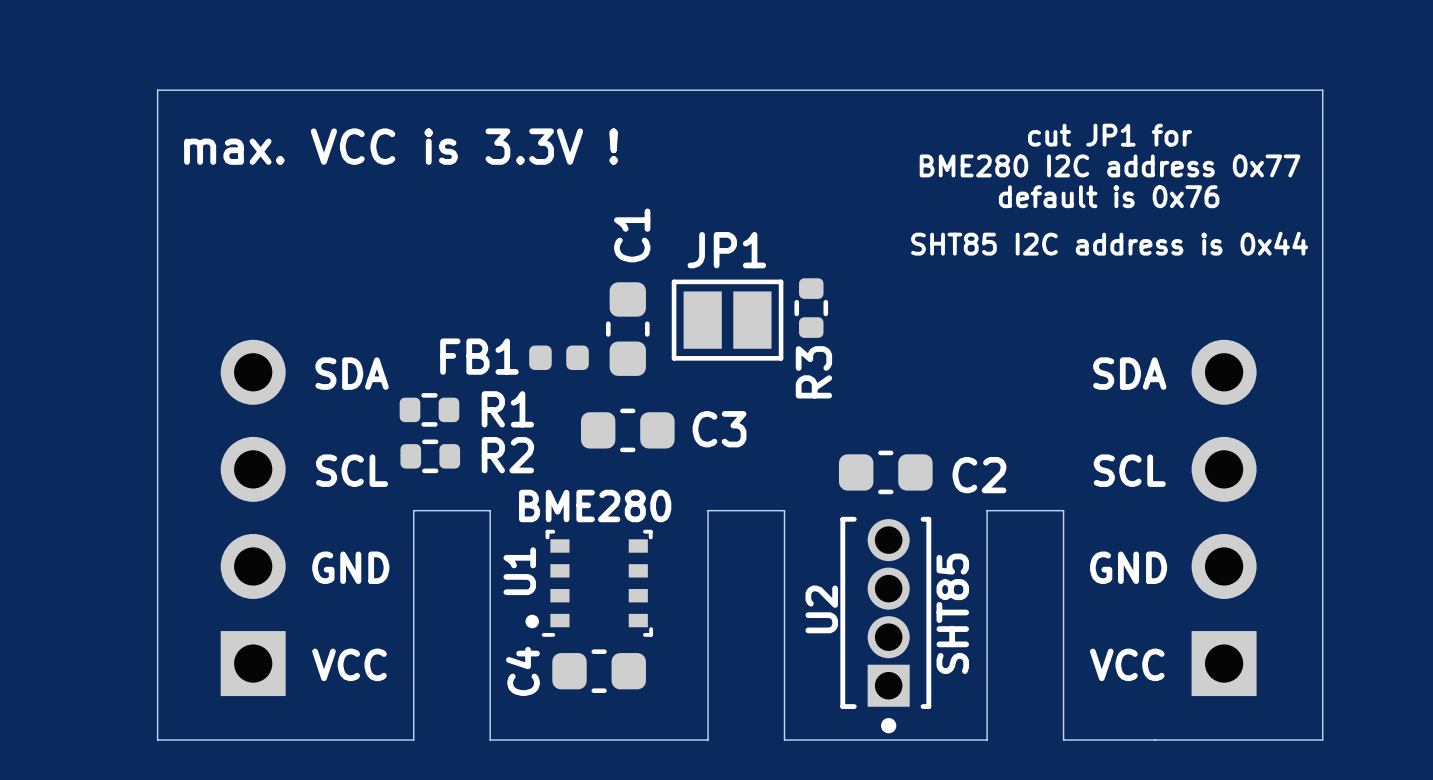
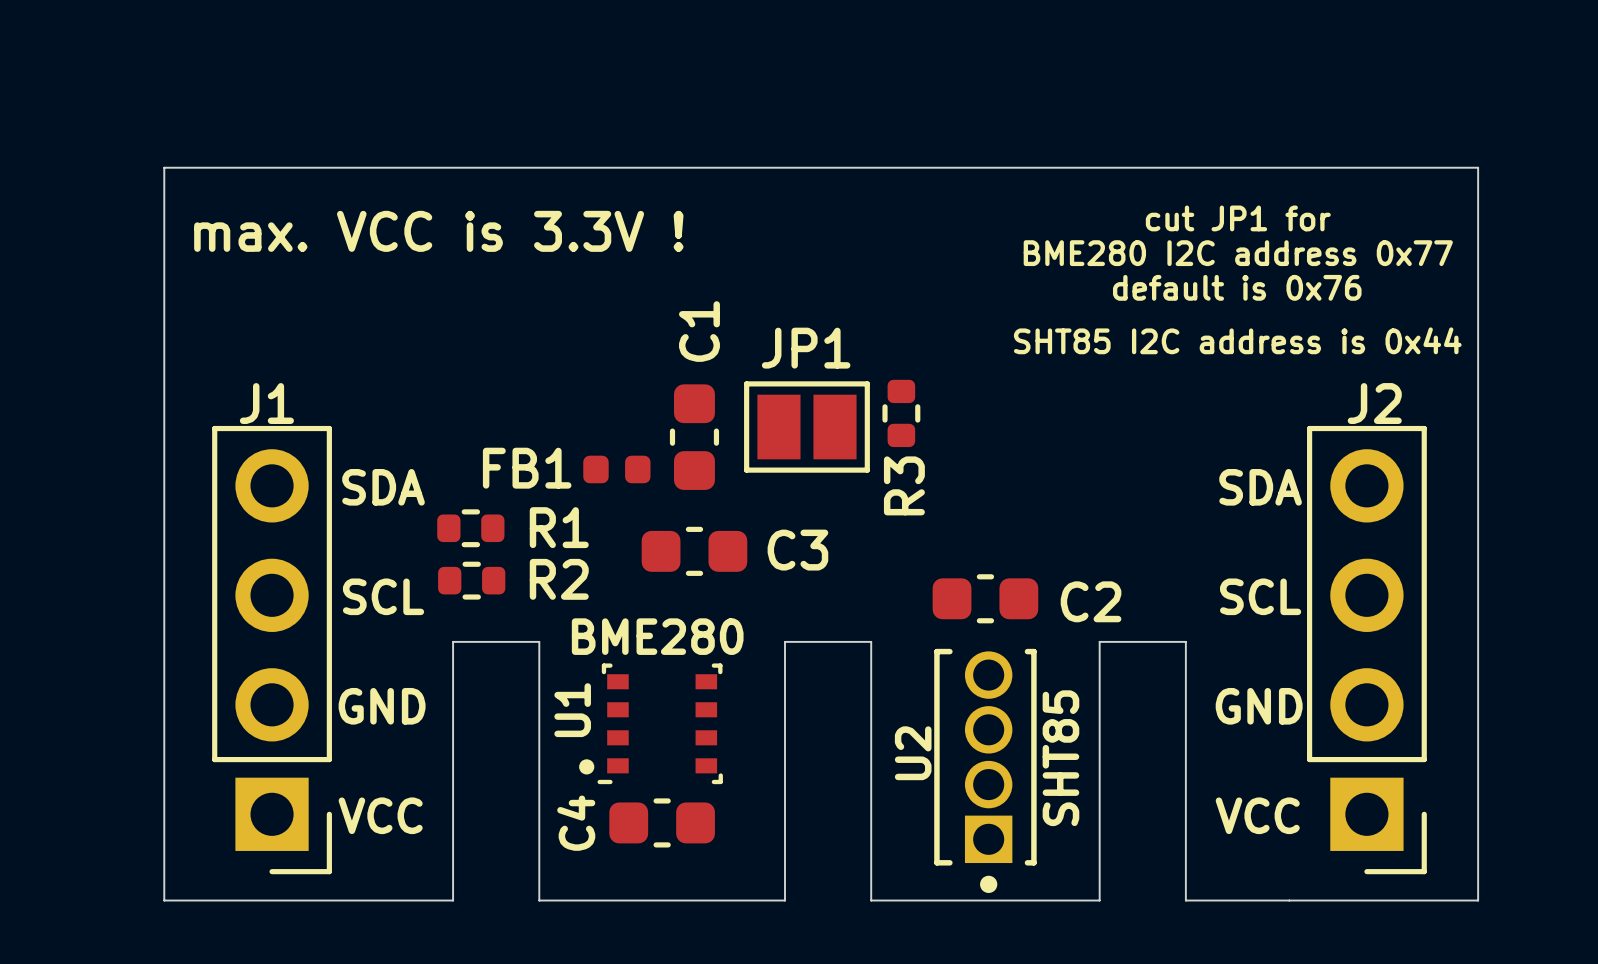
J1 side: bottom (253, 517) -> top (272, 650)
J2 side: bottom (1224, 517) -> top (1366, 650)

